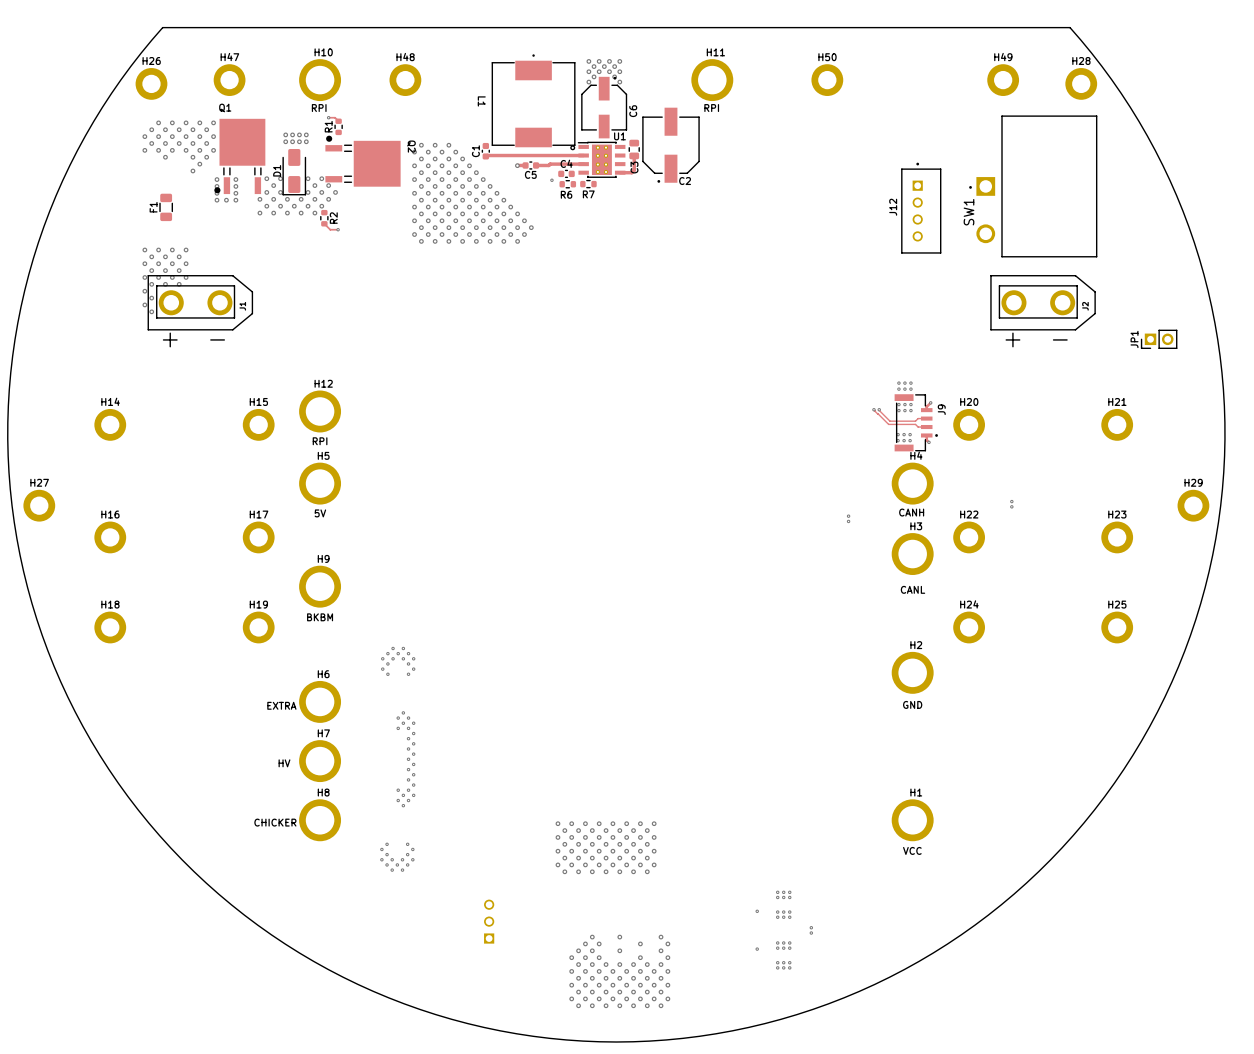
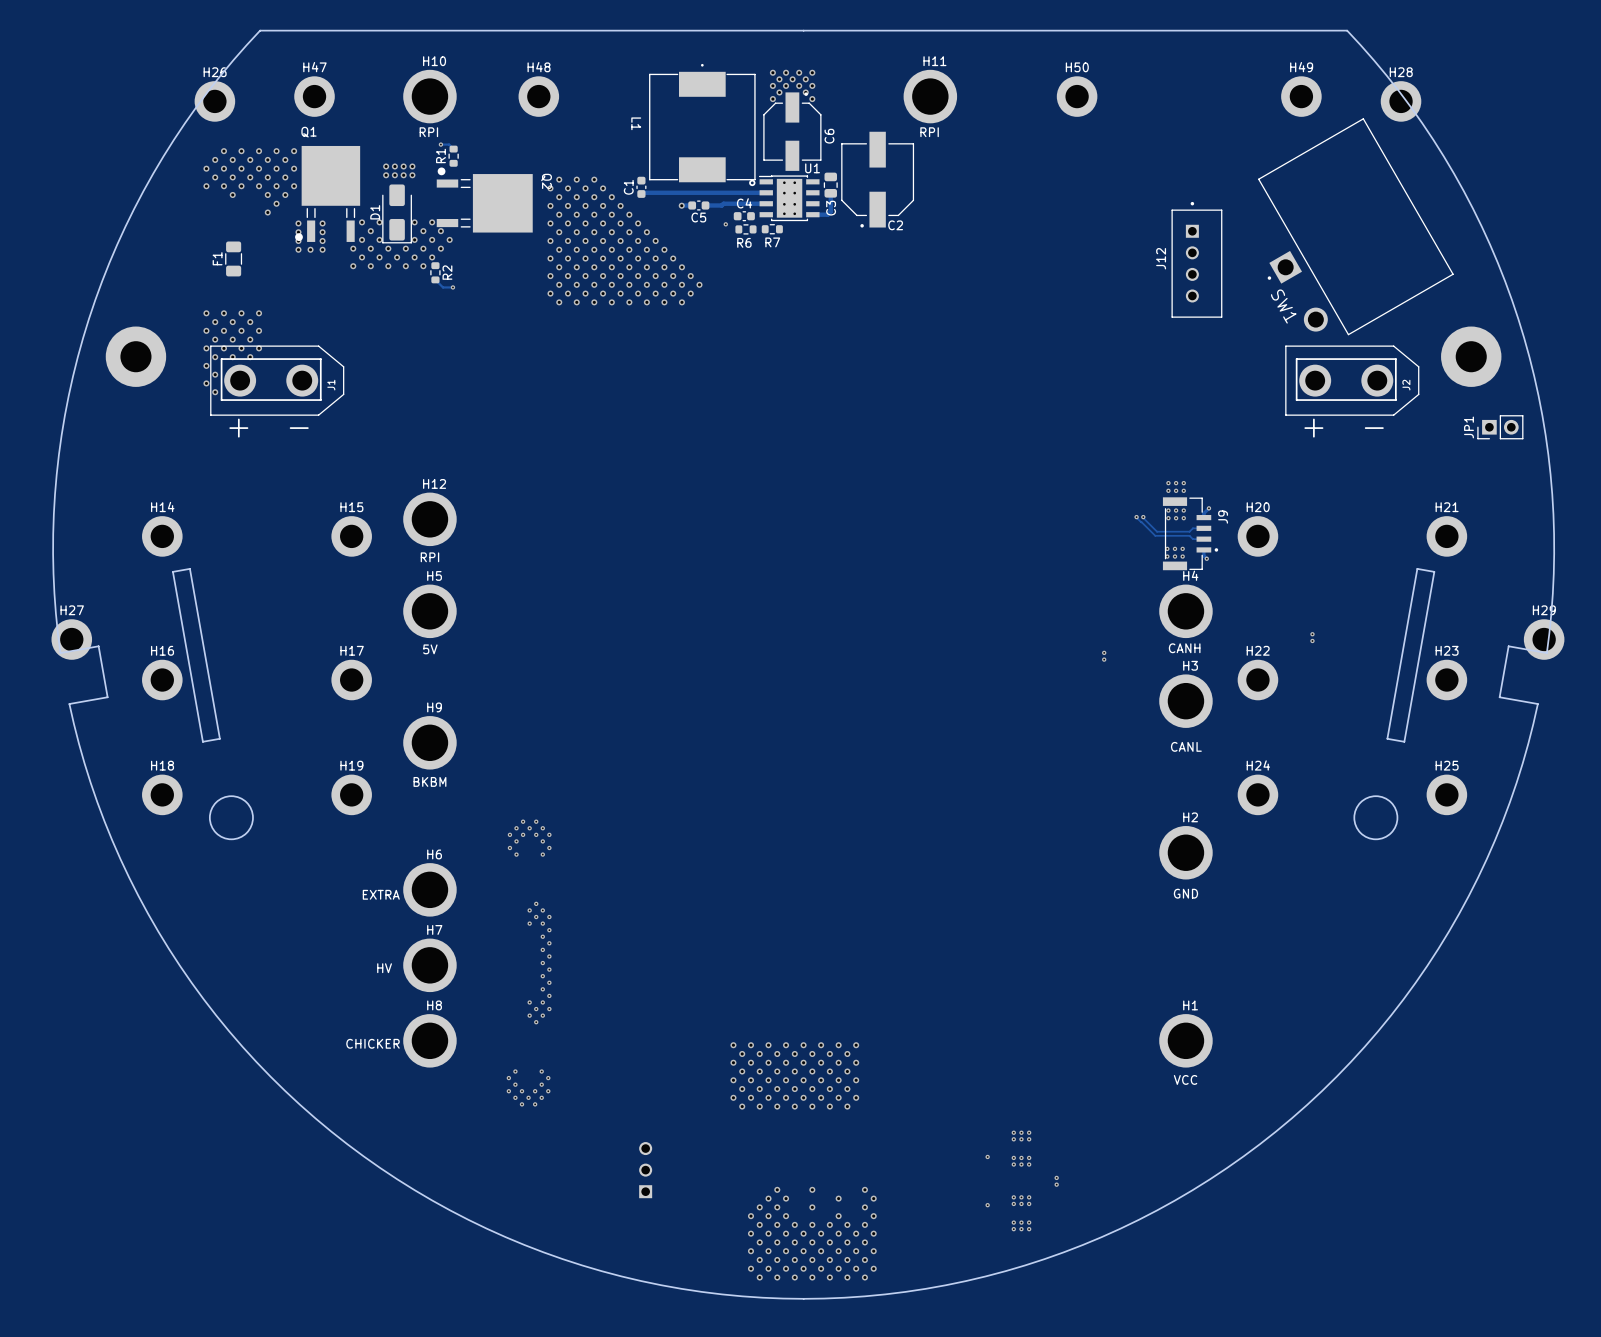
board edge: (162, 27) (1070, 27) (1111, 79) (1139, 121) (1169, 180) (1188, 226) (1203, 274) (1214, 323) (1221, 372) (1224, 439) (1222, 489) (1212, 555) (1200, 603) (1184, 651) (1164, 696) (1132, 755) (1104, 796) (1073, 835) (1038, 871) (988, 915) (933, 952) (889, 977) (844, 997) (780, 1019) (732, 1030) (666, 1039) (616, 1042) (549, 1038) (484, 1027) (419, 1009) (373, 991) (313, 961) (271, 934) (218, 894) (182, 859) (138, 809) (108, 769) (75, 711) (54, 666) (32, 603) (16, 538) (8, 472) (8, 405) (12, 356) (21, 306) (38, 242) (56, 195) (85, 135) (121, 79) (162, 27) -> (260, 30) (220, 75) (173, 139) (134, 208) (102, 281) (77, 357) (61, 435) (53, 514) (53, 573) (60, 653) (98, 646) (107, 697) (69, 704) (90, 782) (120, 859) (158, 931) (191, 982) (229, 1031) (285, 1090) (331, 1131) (397, 1179) (450, 1210) (524, 1244) (601, 1271) (661, 1285) (742, 1296) (824, 1298) (905, 1291) (965, 1281) (1044, 1259) (1120, 1228) (1192, 1190) (1243, 1156) (1291, 1118) (1350, 1061) (1403, 999) (1438, 948) (1468, 895) (1502, 821) (1522, 763) (1537, 704) (1499, 697) (1508, 646) (1546, 653) (1551, 613) (1554, 553) (1550, 474) (1542, 415) (1524, 337) (1505, 281) (1473, 208) (1433, 139) (1386, 75) (1347, 30) (260, 30)
SW1 rotation: 0° (1033, 186) -> 30° counterclockwise (1355, 226)
SW1 name position: SW1 (969, 212) -> SW1 (1283, 306)
part: none -> (135, 356)
part: none -> (1471, 356)
board edge: none -> (189, 568) (172, 571) (202, 741) (219, 738) (189, 568)
board edge: none -> (1417, 568) (1434, 571) (1404, 741) (1387, 738) (1417, 568)
round board edge: none -> [208, 795, 254, 841]
round board edge: none -> [1353, 795, 1399, 841]

